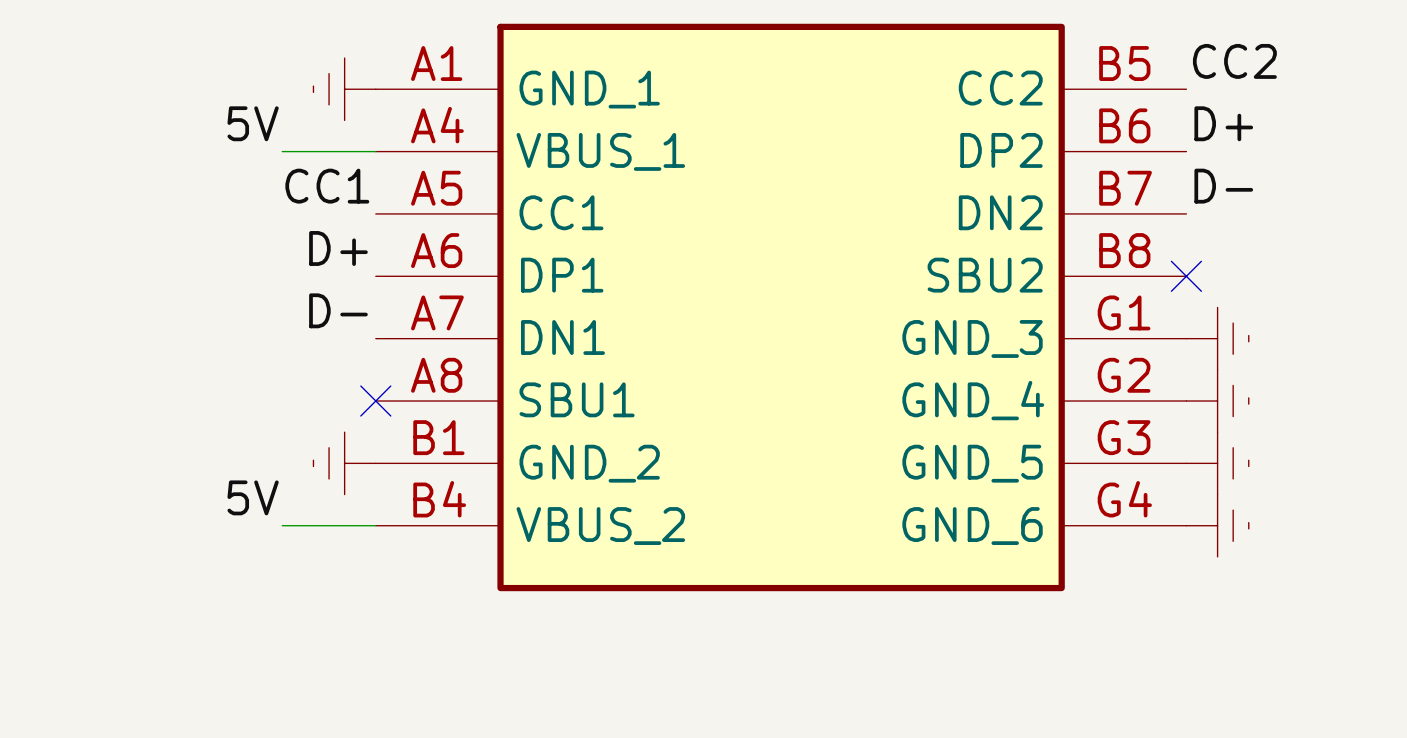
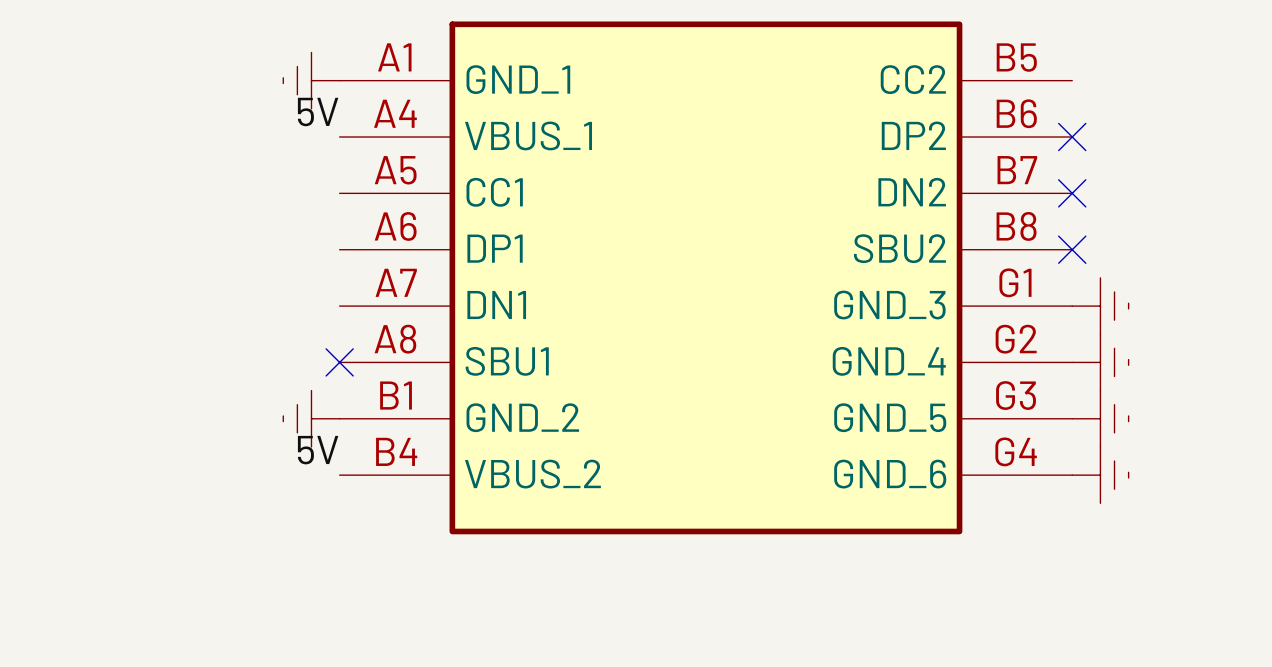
label: CC2 (1234, 61) -> none
label position: 5V (253, 123) -> 5V (318, 112)
label: D+ (1223, 123) -> none
wire: (282, 151) (375, 151) -> none
no-connect mark: none -> (1072, 137)
label: CC1 (327, 186) -> none
label: D- (1223, 186) -> none
no-connect mark: none -> (1072, 193)
label: D+ (338, 248) -> none
label: D- (338, 310) -> none
label position: 5V (253, 497) -> 5V (318, 450)
wire: (282, 525) (375, 525) -> none

